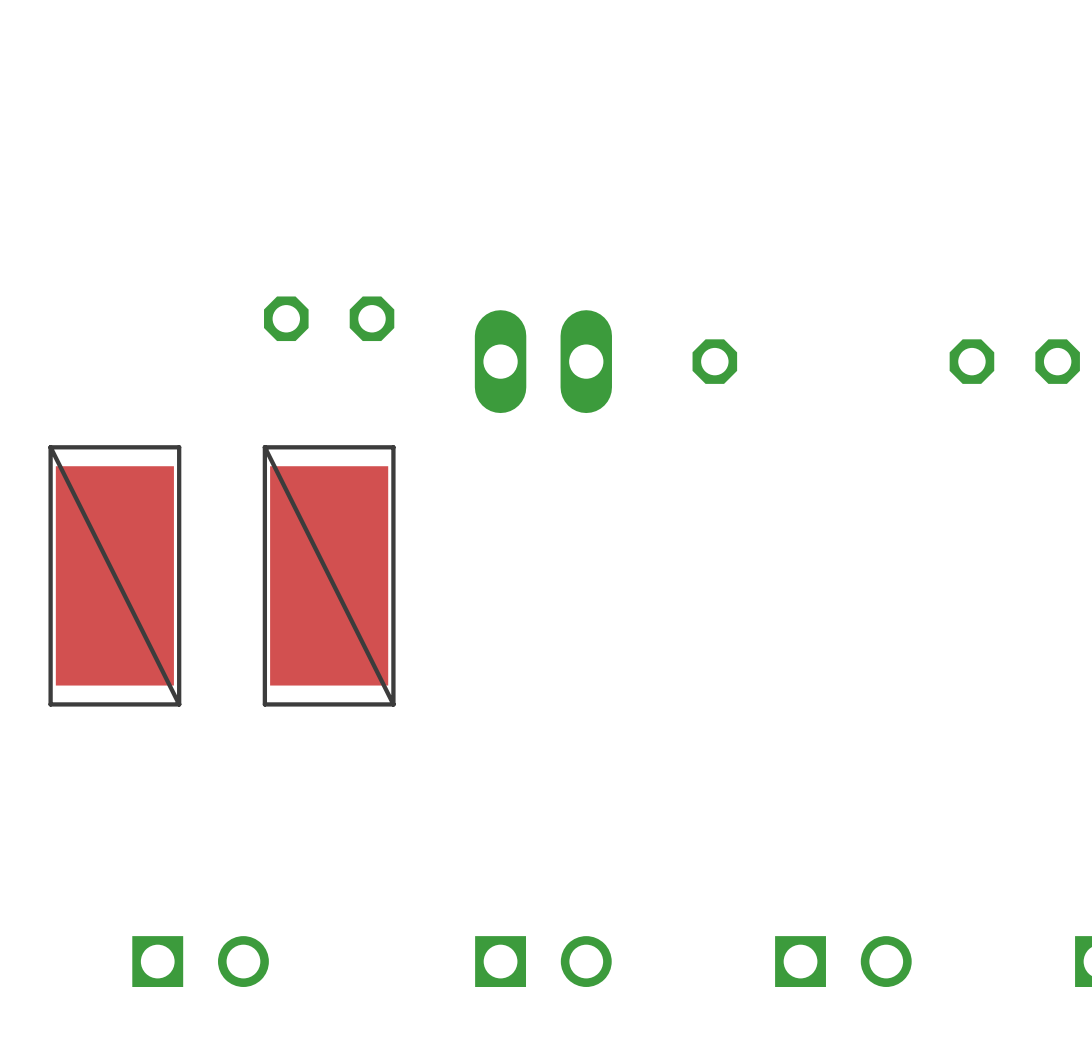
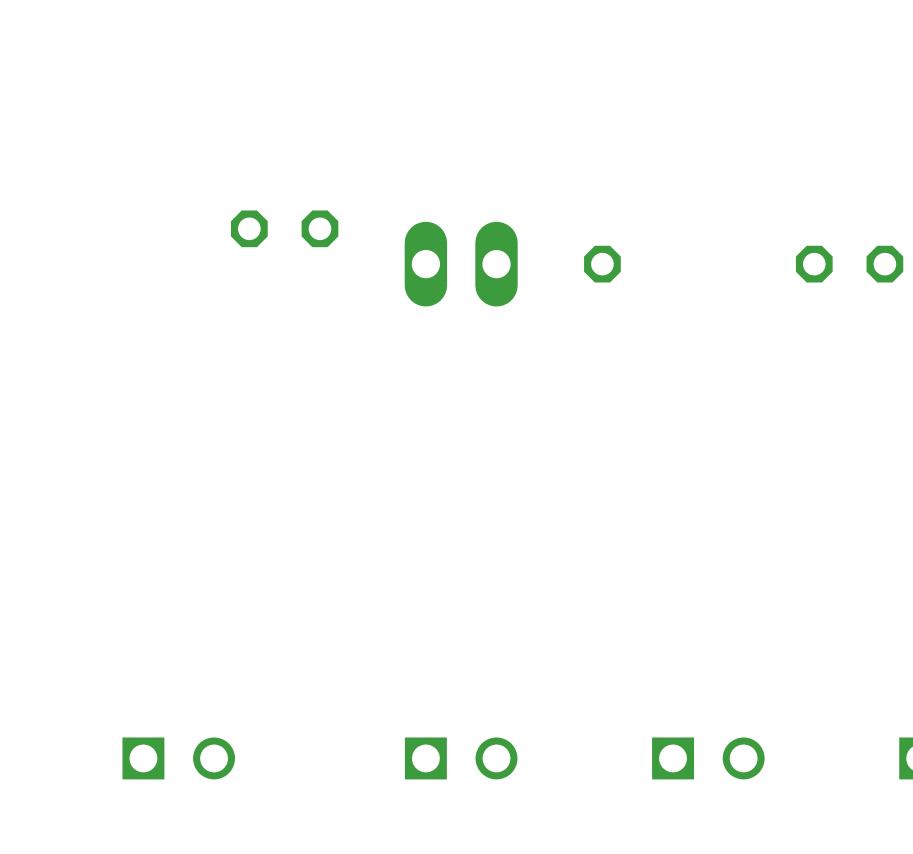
part: (114, 575) -> none
part: (329, 575) -> none

